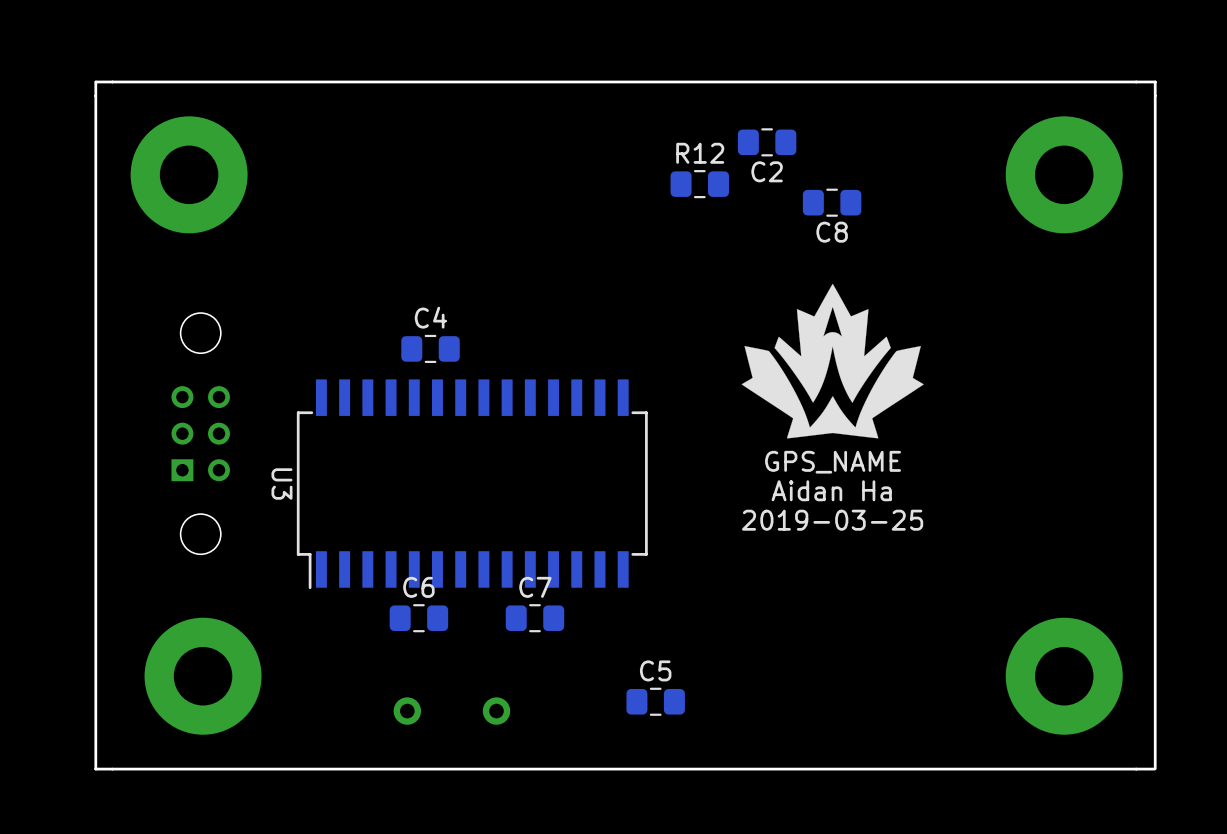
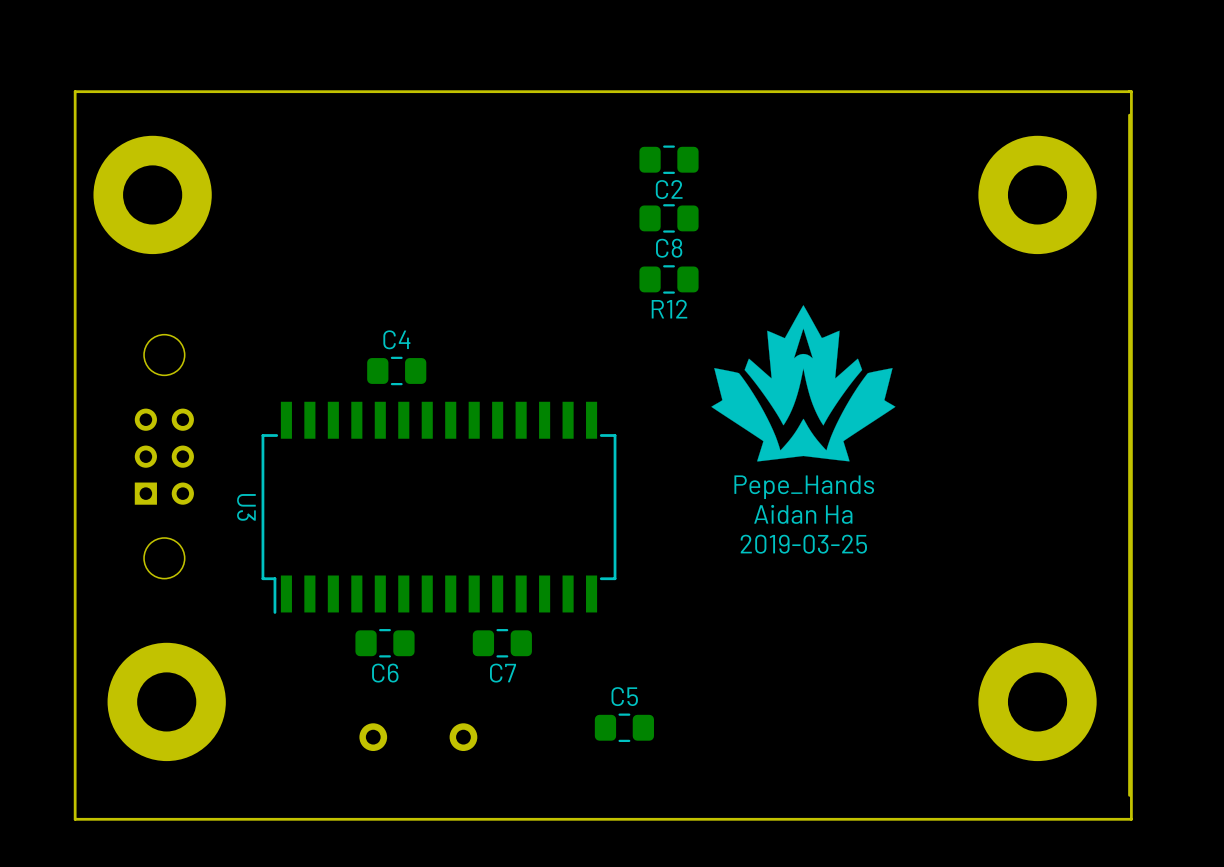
board edge: none -> (1131, 91) (75, 91) (75, 819) (1131, 819) (1131, 91)
board edge: (95, 81) (95, 769) (112, 769) -> none
board edge: (96, 81) (1155, 81) (1155, 95) -> none
C2 position: (767, 142) -> (669, 159)
R12 name position: R12 (700, 153) -> R12 (669, 309)
R12 position: (699, 184) -> (669, 279)
C8 position: (832, 202) -> (669, 218)
text: GPS_NAME (833, 462) -> Pepe_Hands (804, 487)
C6 name position: C6 (418, 587) -> C6 (385, 673)
C7 name position: C7 (535, 587) -> C7 (503, 673)
board edge: (1154, 769) (112, 769) -> none

